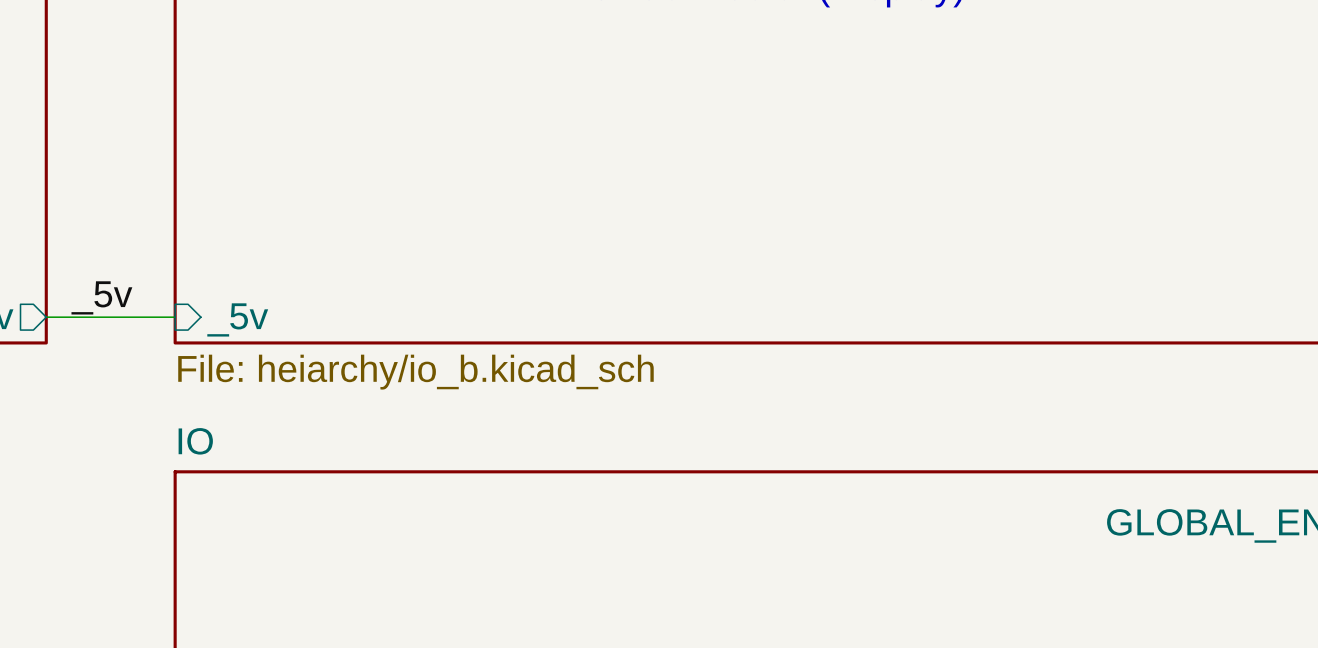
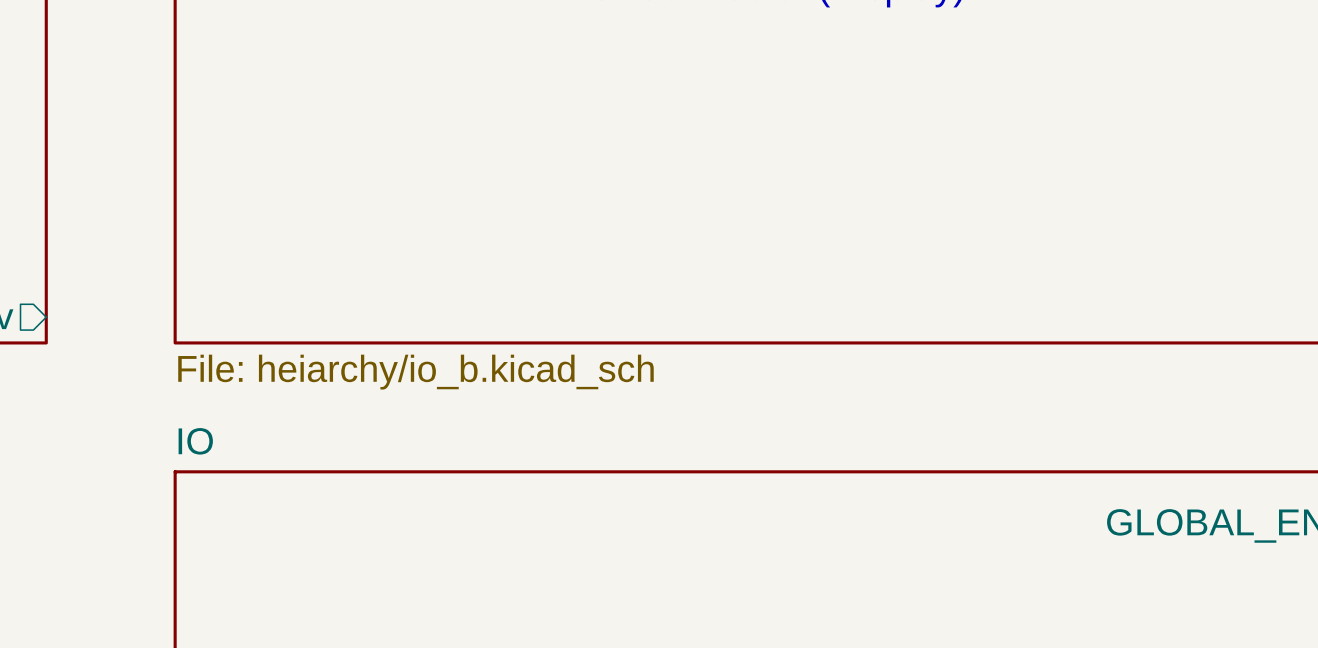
label: _5v (101, 297) -> none
wire: (46, 317) (175, 317) -> none
sheet pin: _5v (237, 319) -> none

